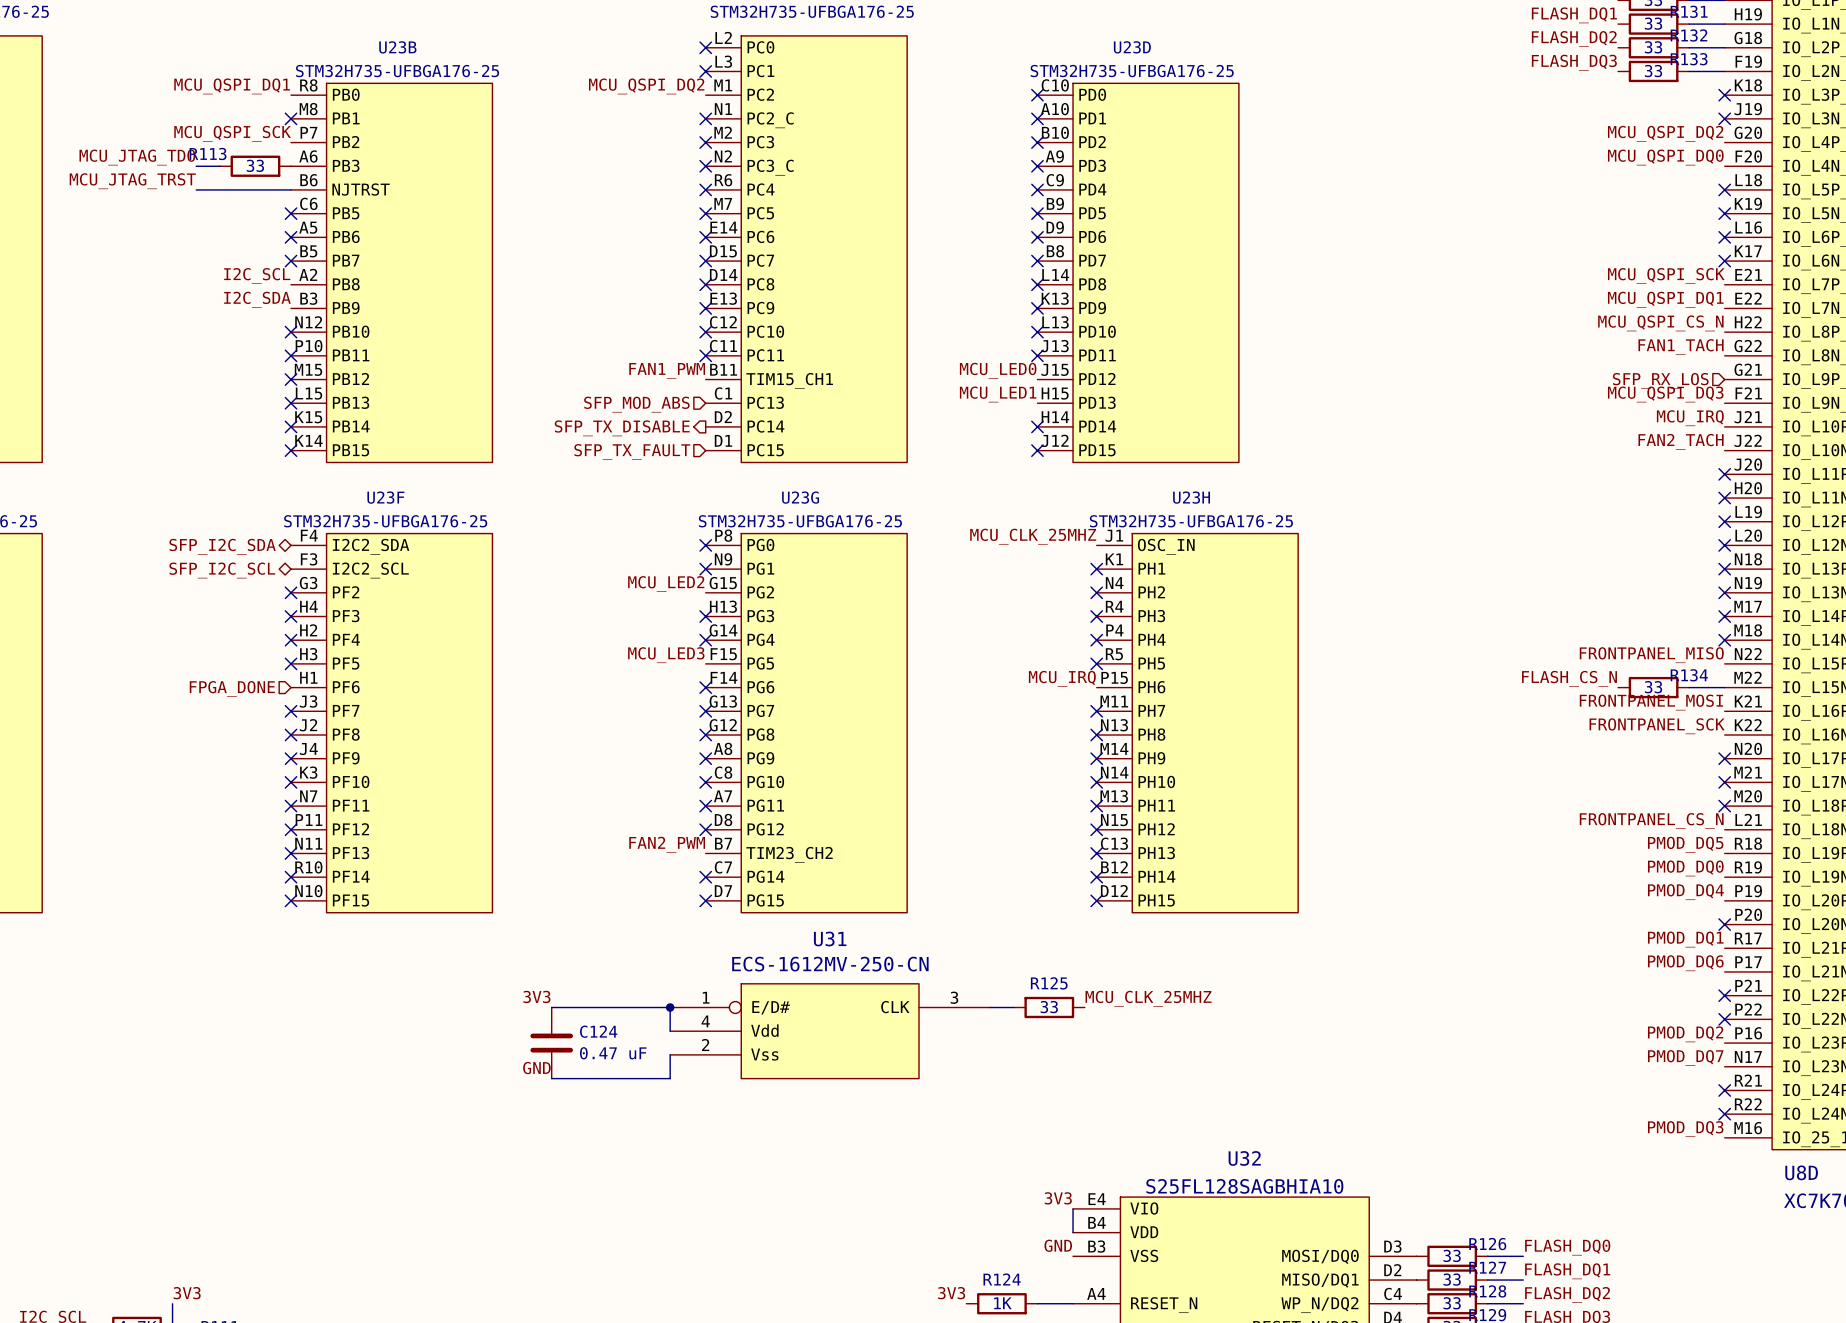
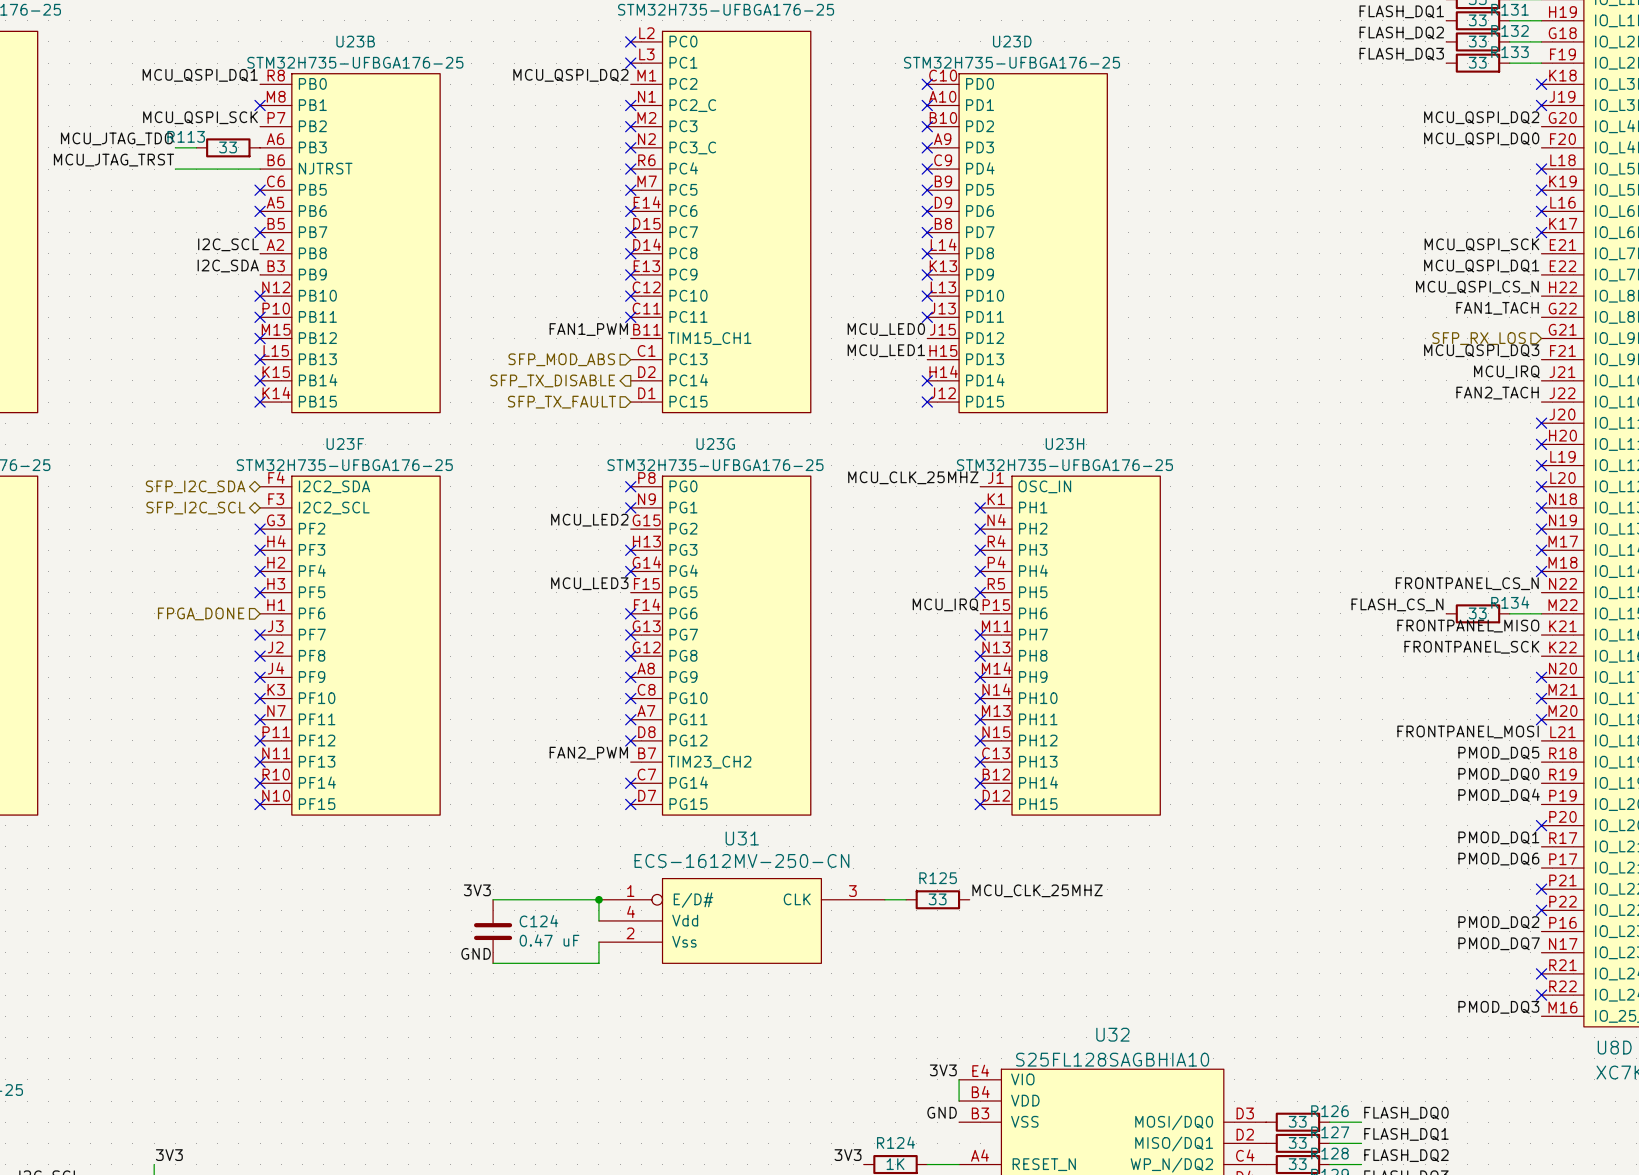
label: FRONTPANEL_MISO (1651, 655) -> FRONTPANEL_CS_N (1467, 583)
label: FRONTPANEL_MOSI (1651, 702) -> FRONTPANEL_MISO (1468, 626)
label: FRONTPANEL_CS_N (1651, 821) -> FRONTPANEL_MOSI (1468, 731)

